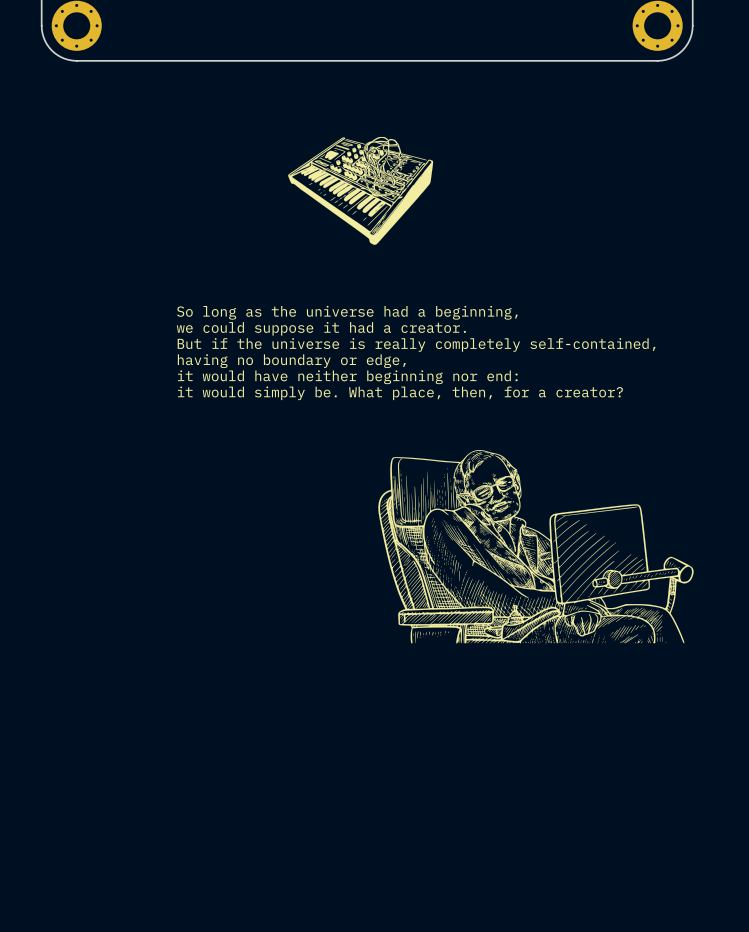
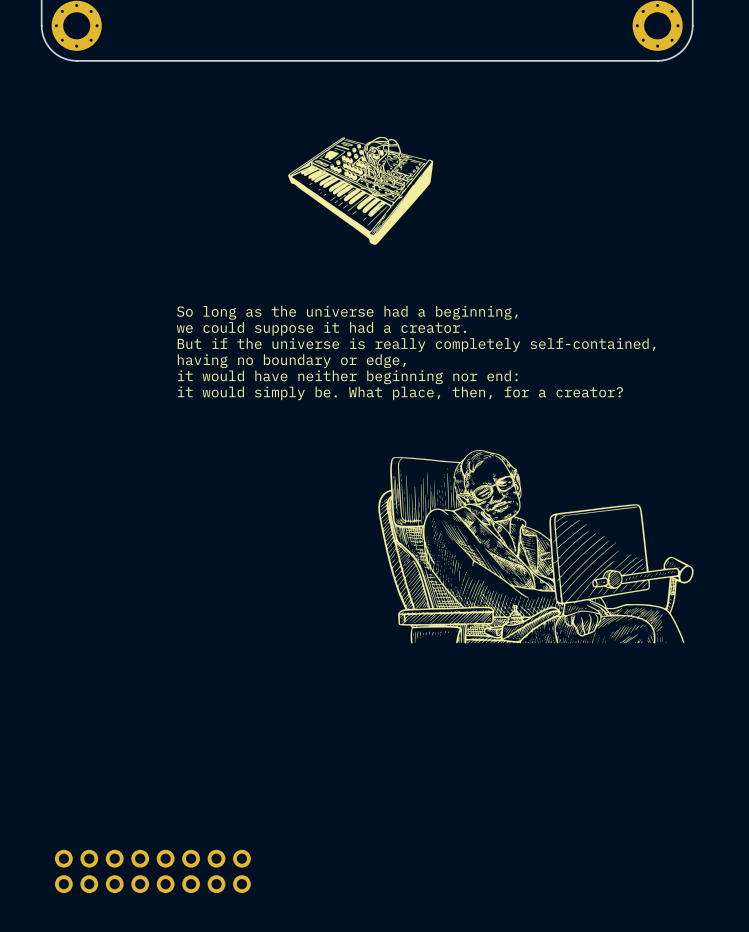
part: none -> (152, 858)
part: none -> (152, 884)

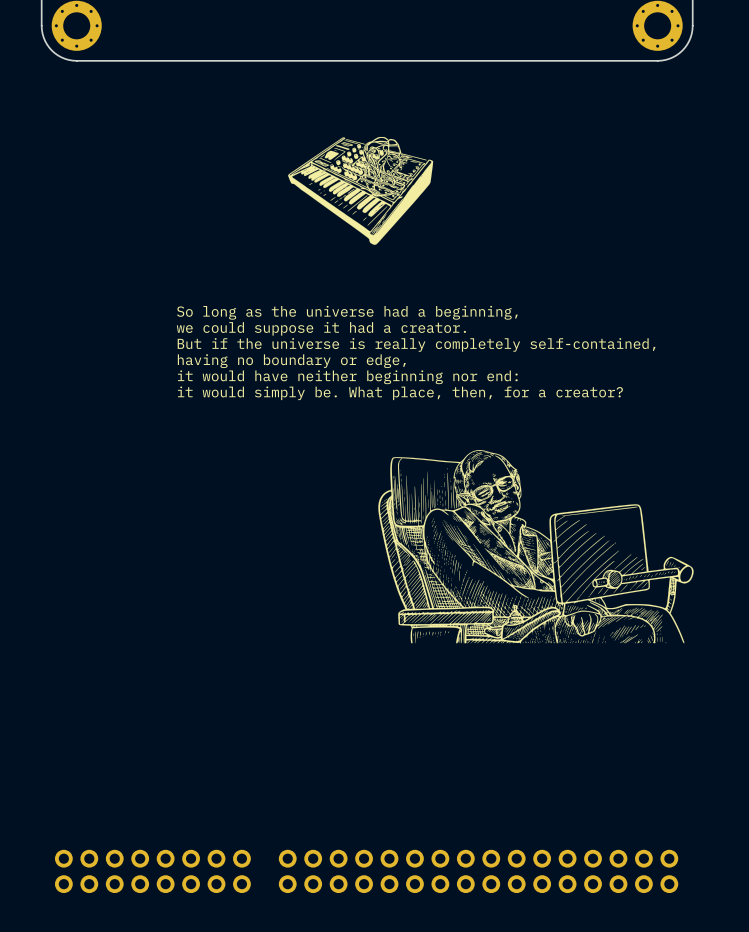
part: none -> (351, 858)
part: none -> (554, 858)
part: none -> (351, 884)
part: none -> (554, 884)

